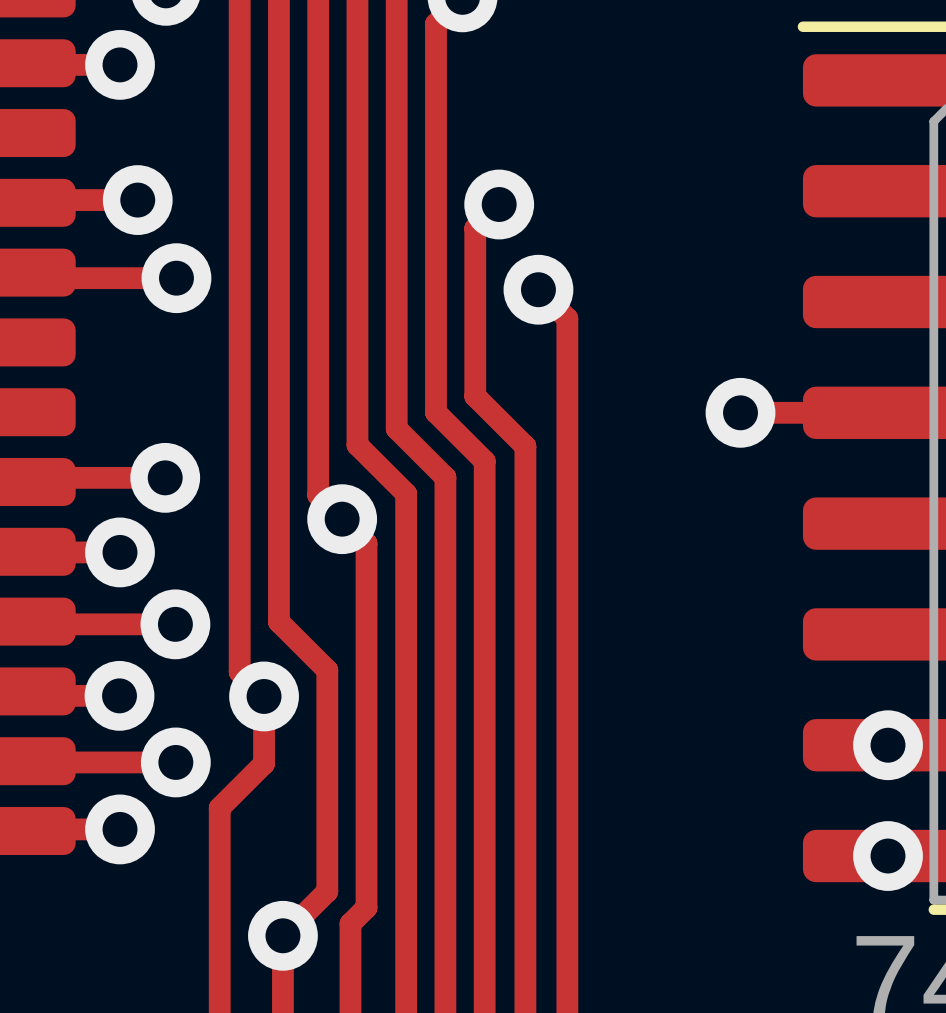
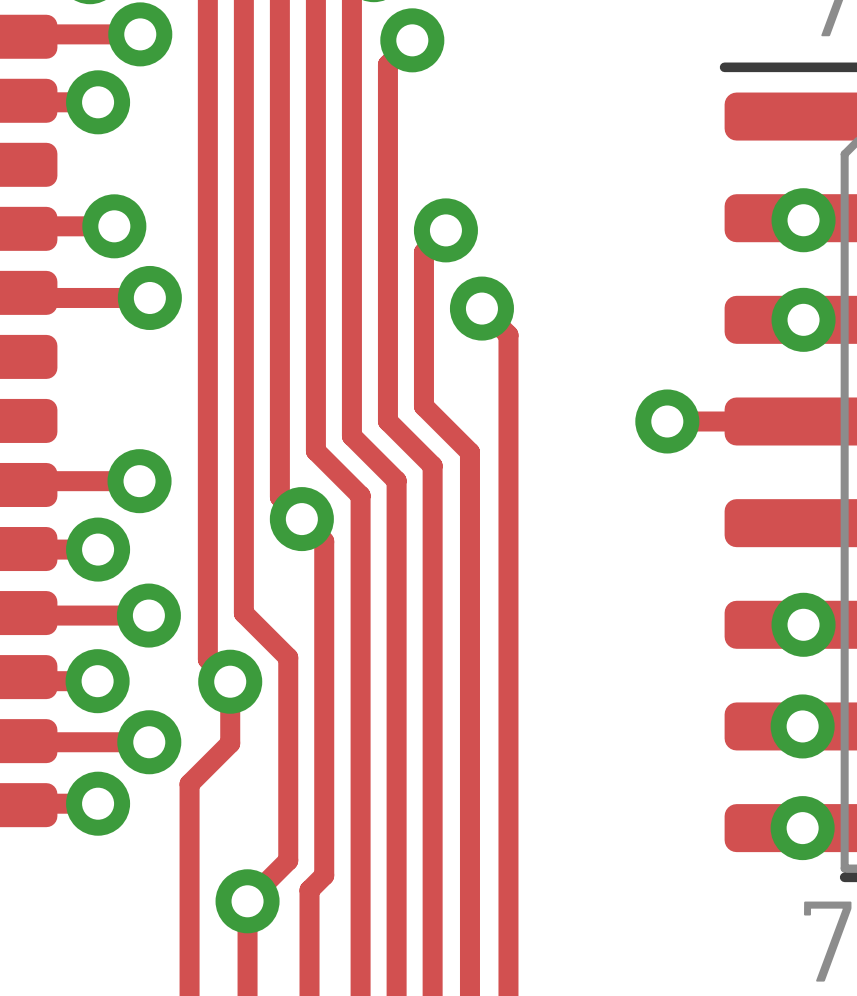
via: none -> (803, 220)
via: none -> (803, 319)
via: none -> (803, 624)

